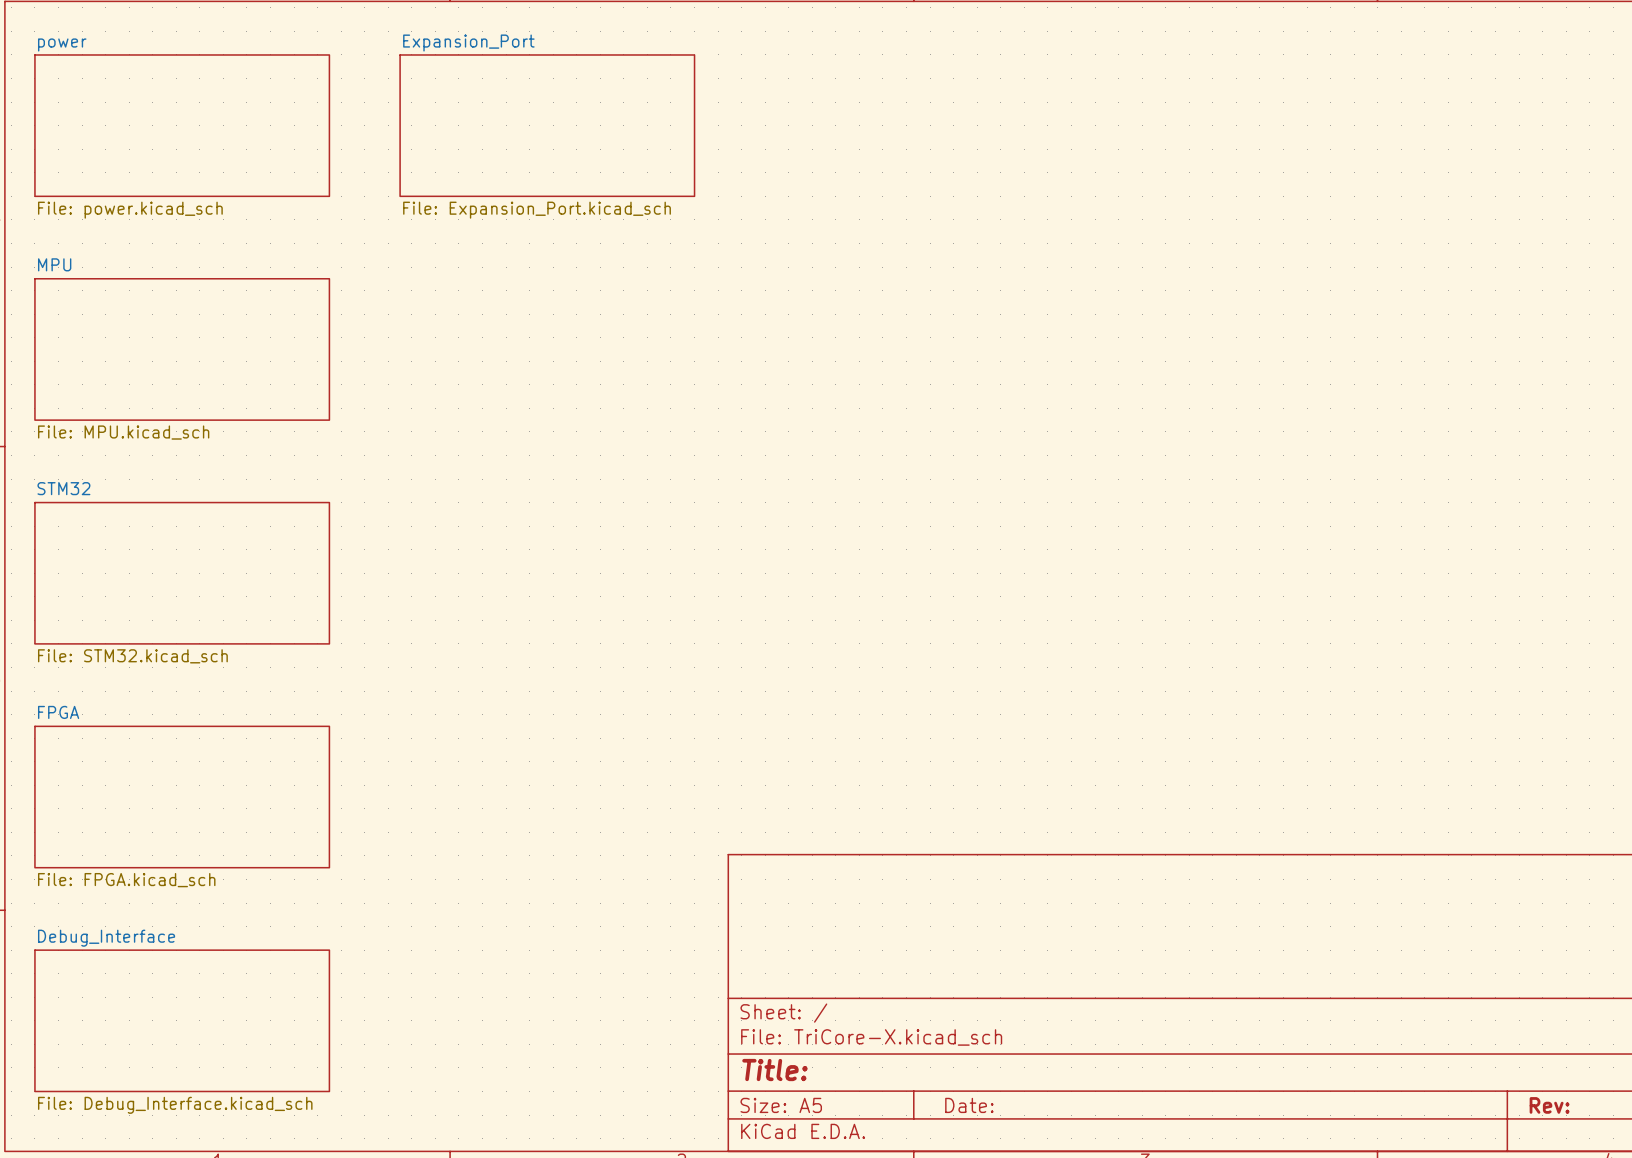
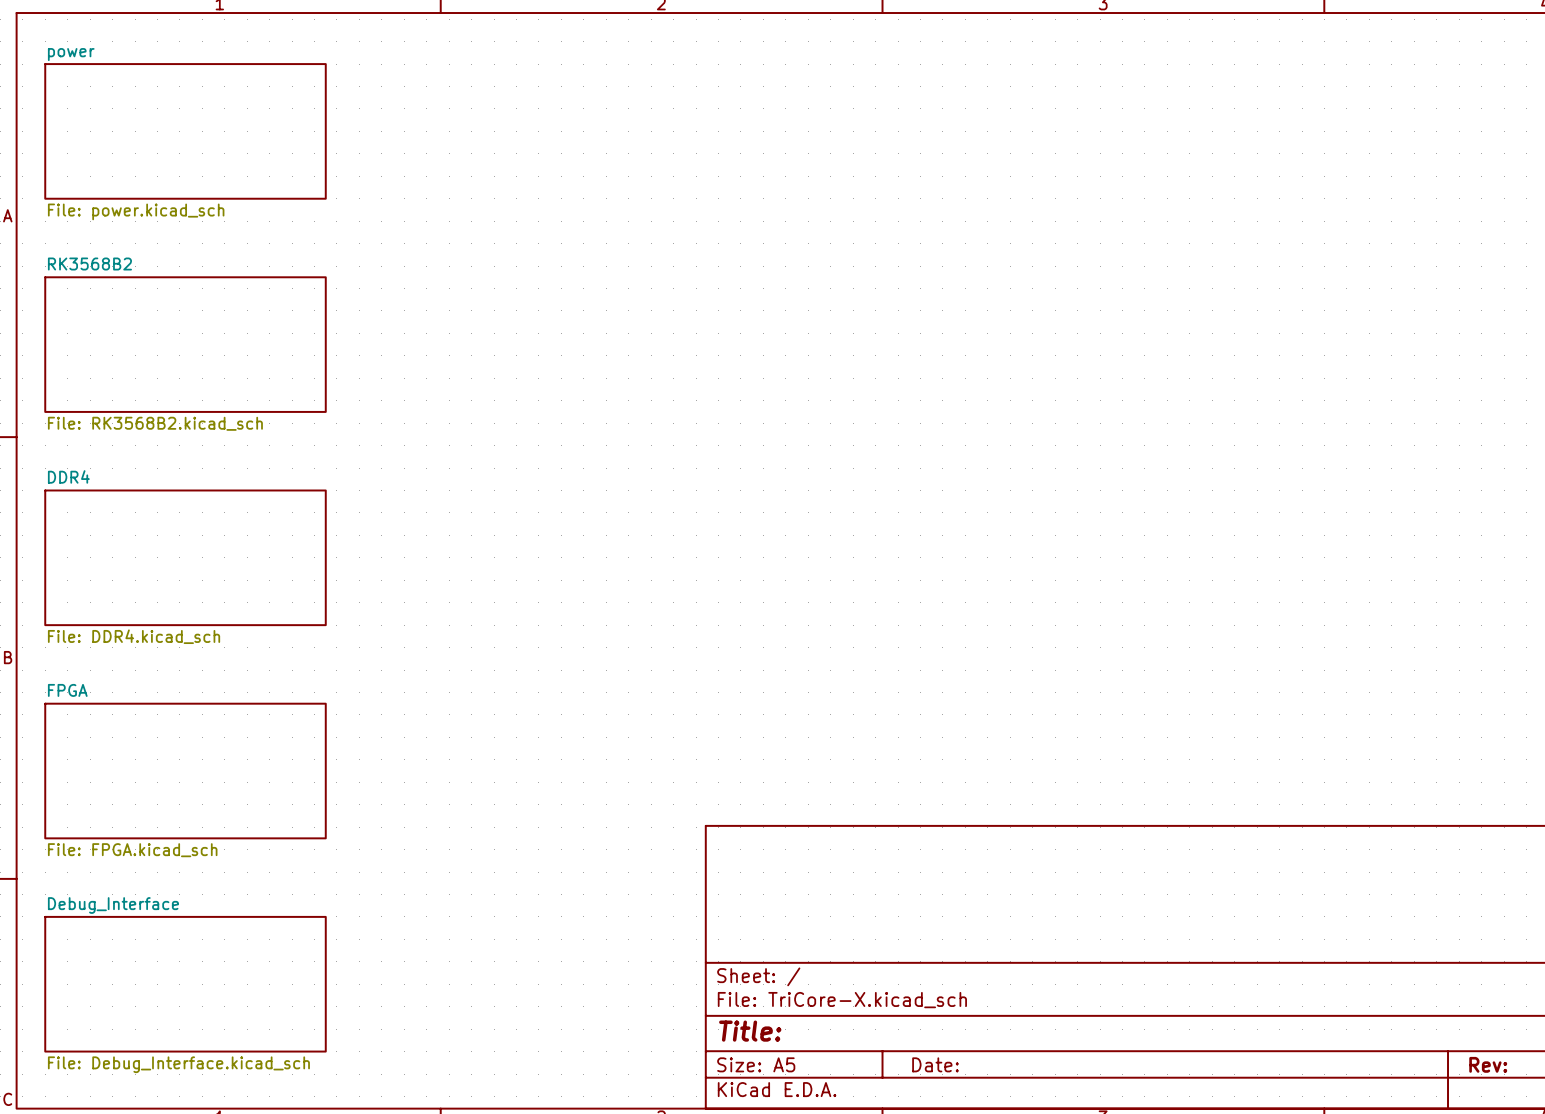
sheet Expansion_Port: File: Expansion_Port.kicad_sch (547, 125) -> none
sheet MPU name: MPU (54, 264) -> RK3568B2 (89, 264)
sheet MPU value: File: MPU.kicad_sch (123, 432) -> File: RK3568B2.kicad_sch (155, 423)
sheet STM32 name: STM32 (63, 488) -> DDR4 (68, 476)
sheet STM32 value: File: STM32.kicad_sch (132, 656) -> File: DDR4.kicad_sch (134, 636)

